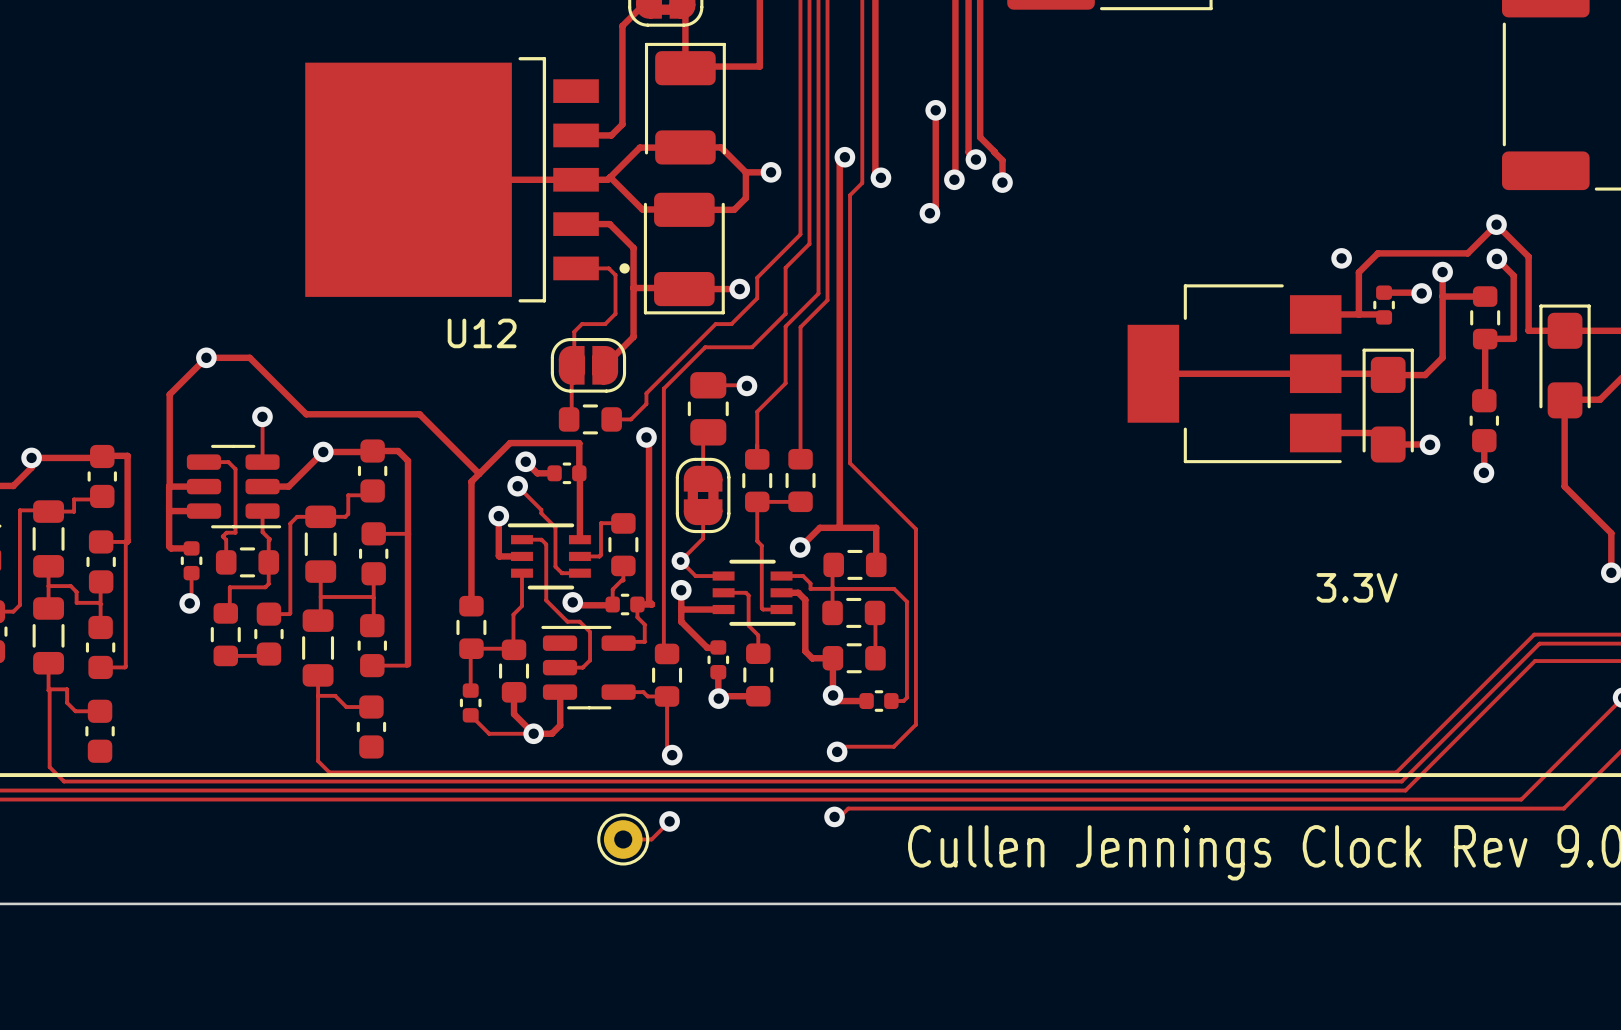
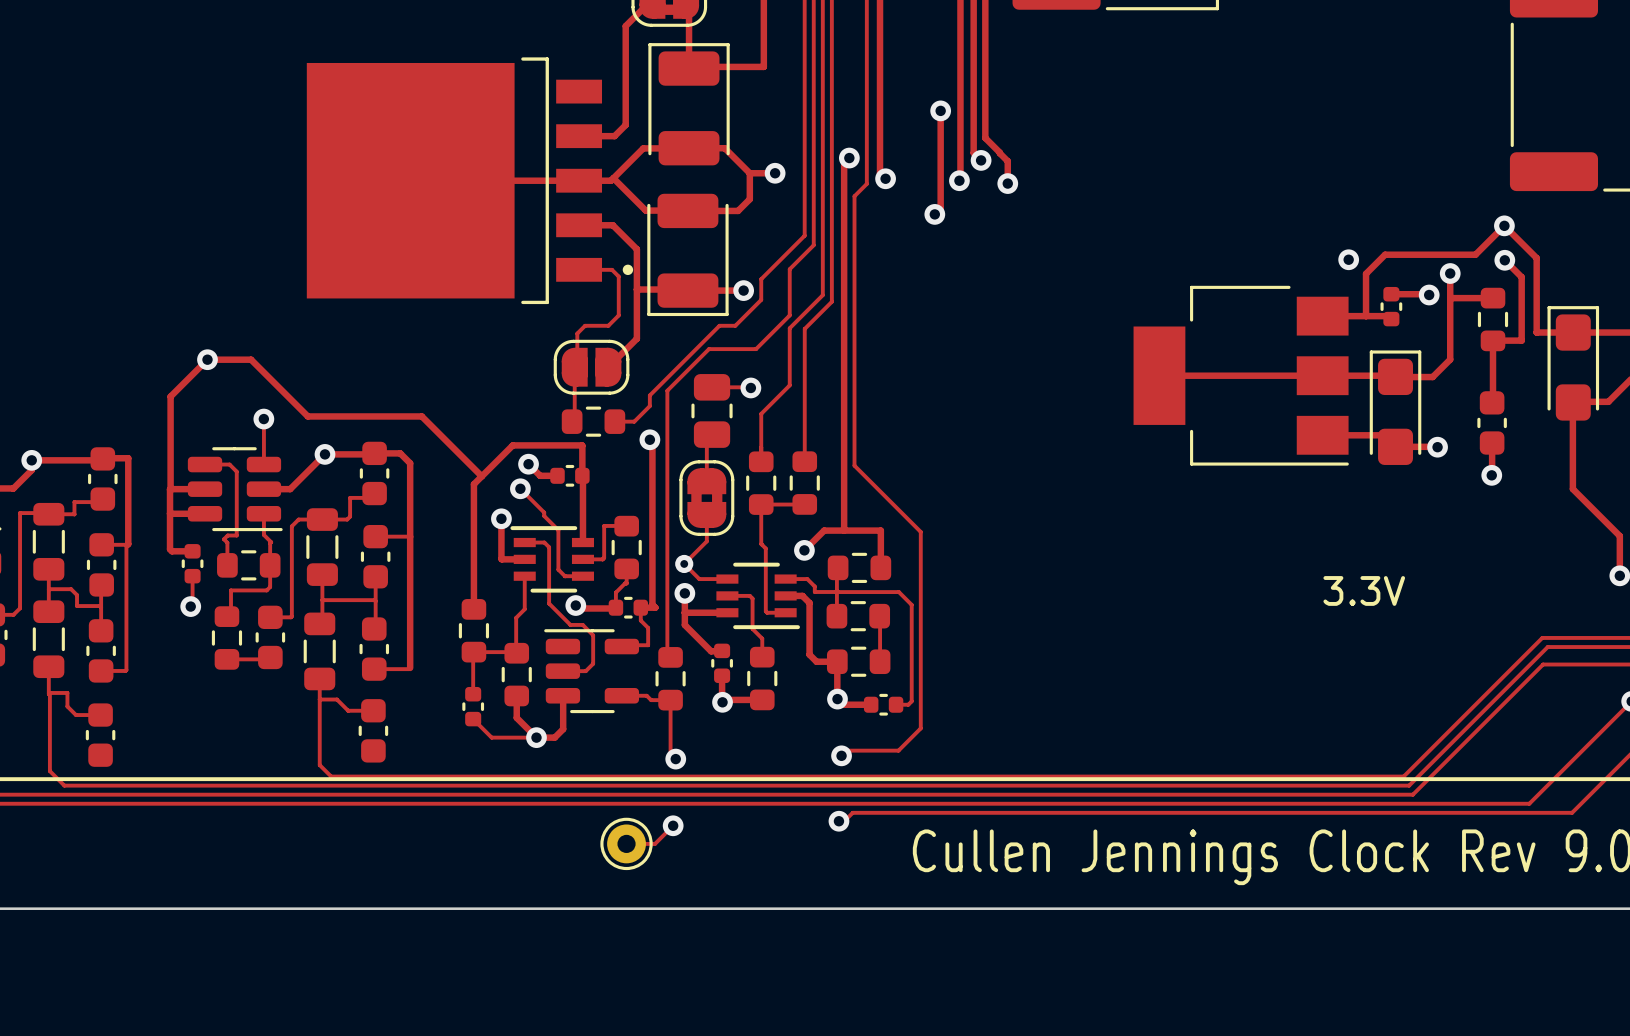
U12 name: U12 (482, 333) -> none

